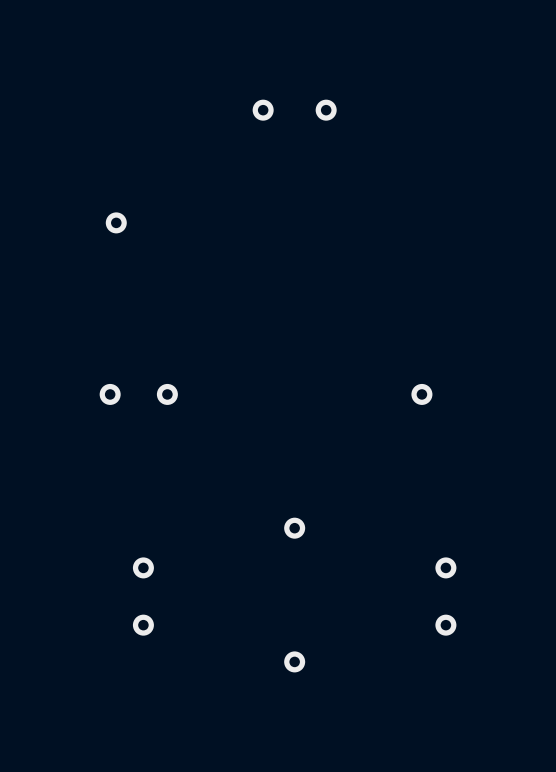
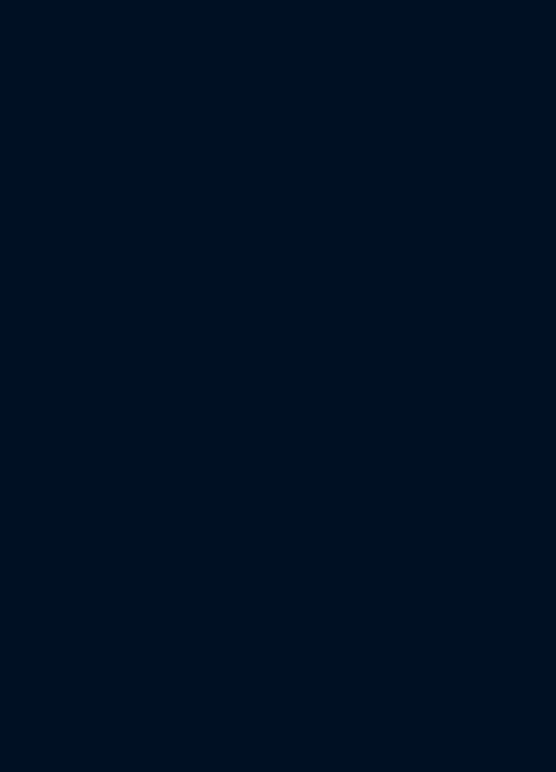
via: (263, 110) -> none
via: (326, 110) -> none
via: (116, 222) -> none
via: (110, 394) -> none
via: (167, 394) -> none
via: (421, 394) -> none
via: (294, 528) -> none
via: (143, 567) -> none
via: (445, 567) -> none
via: (143, 625) -> none
via: (445, 625) -> none
via: (294, 661) -> none

